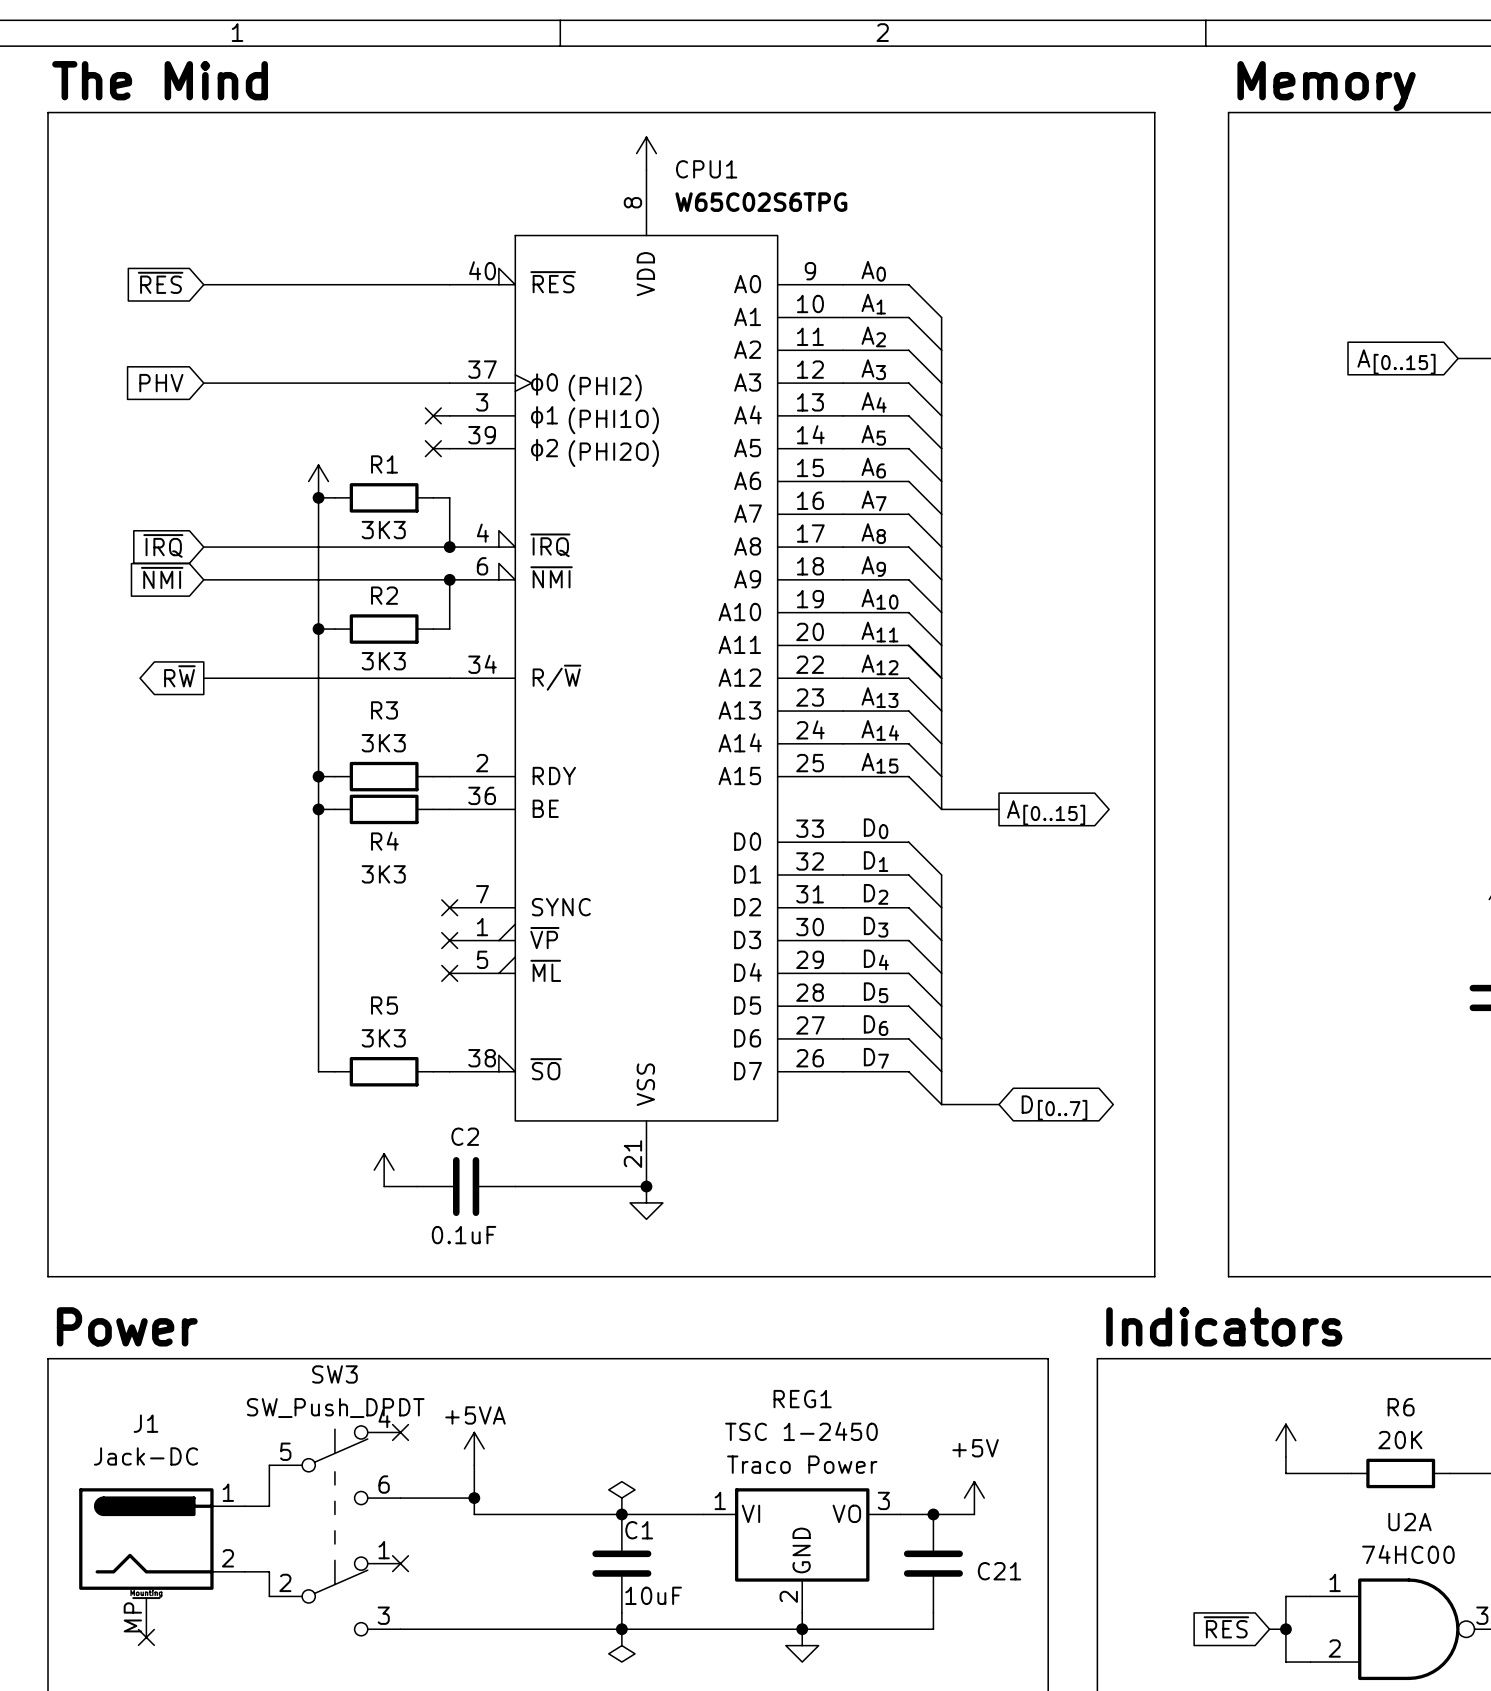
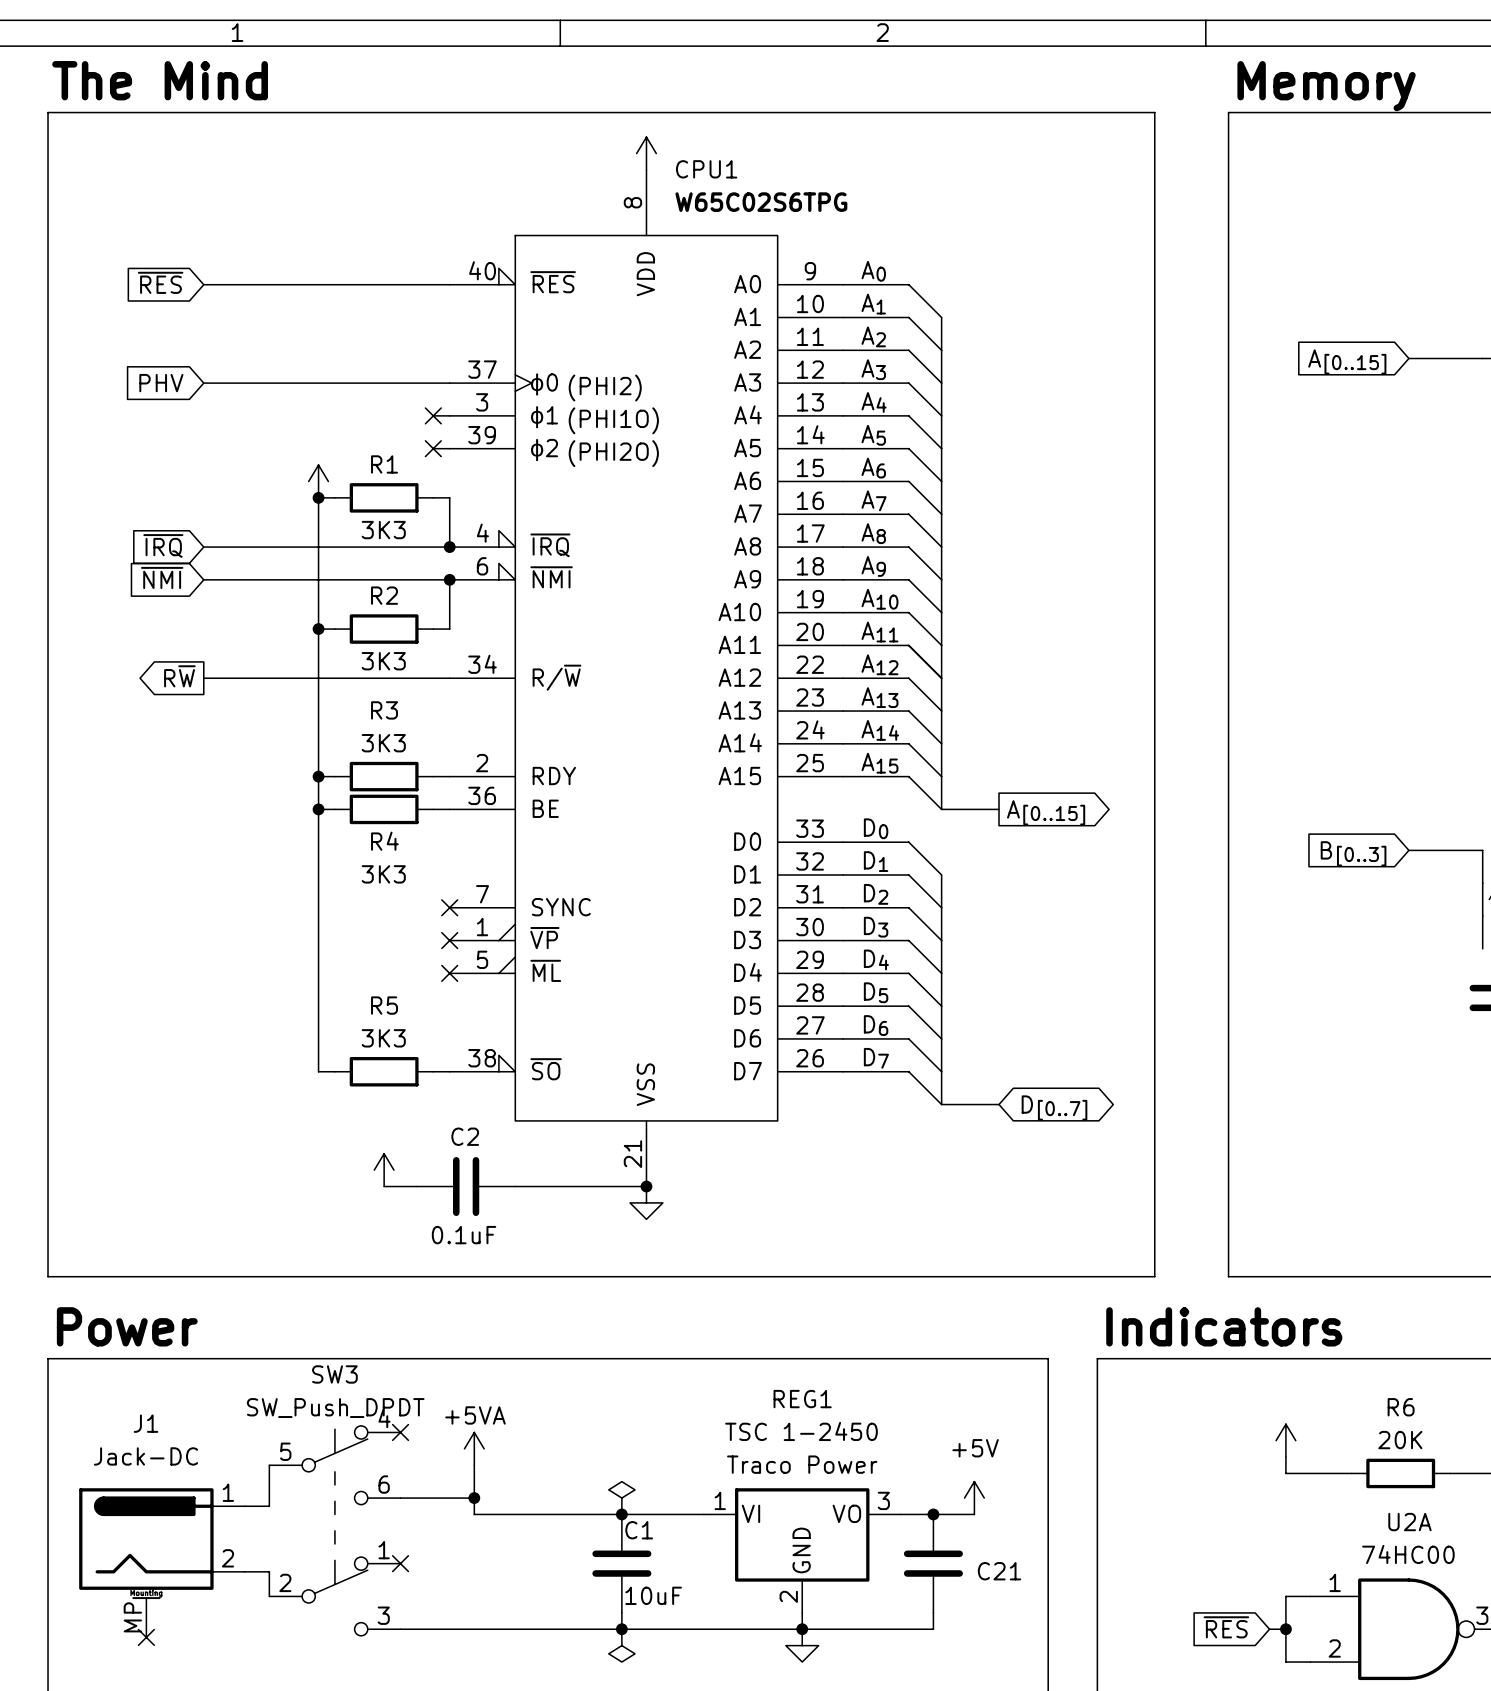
bus: none -> (1408, 358) (1458, 358)
global label position: A[0..15] (1396, 361) -> A[0..15] (1347, 361)
bus: none -> (1408, 850) (1482, 850) (1482, 948)
global label: none -> B[0..3] (1353, 853)

